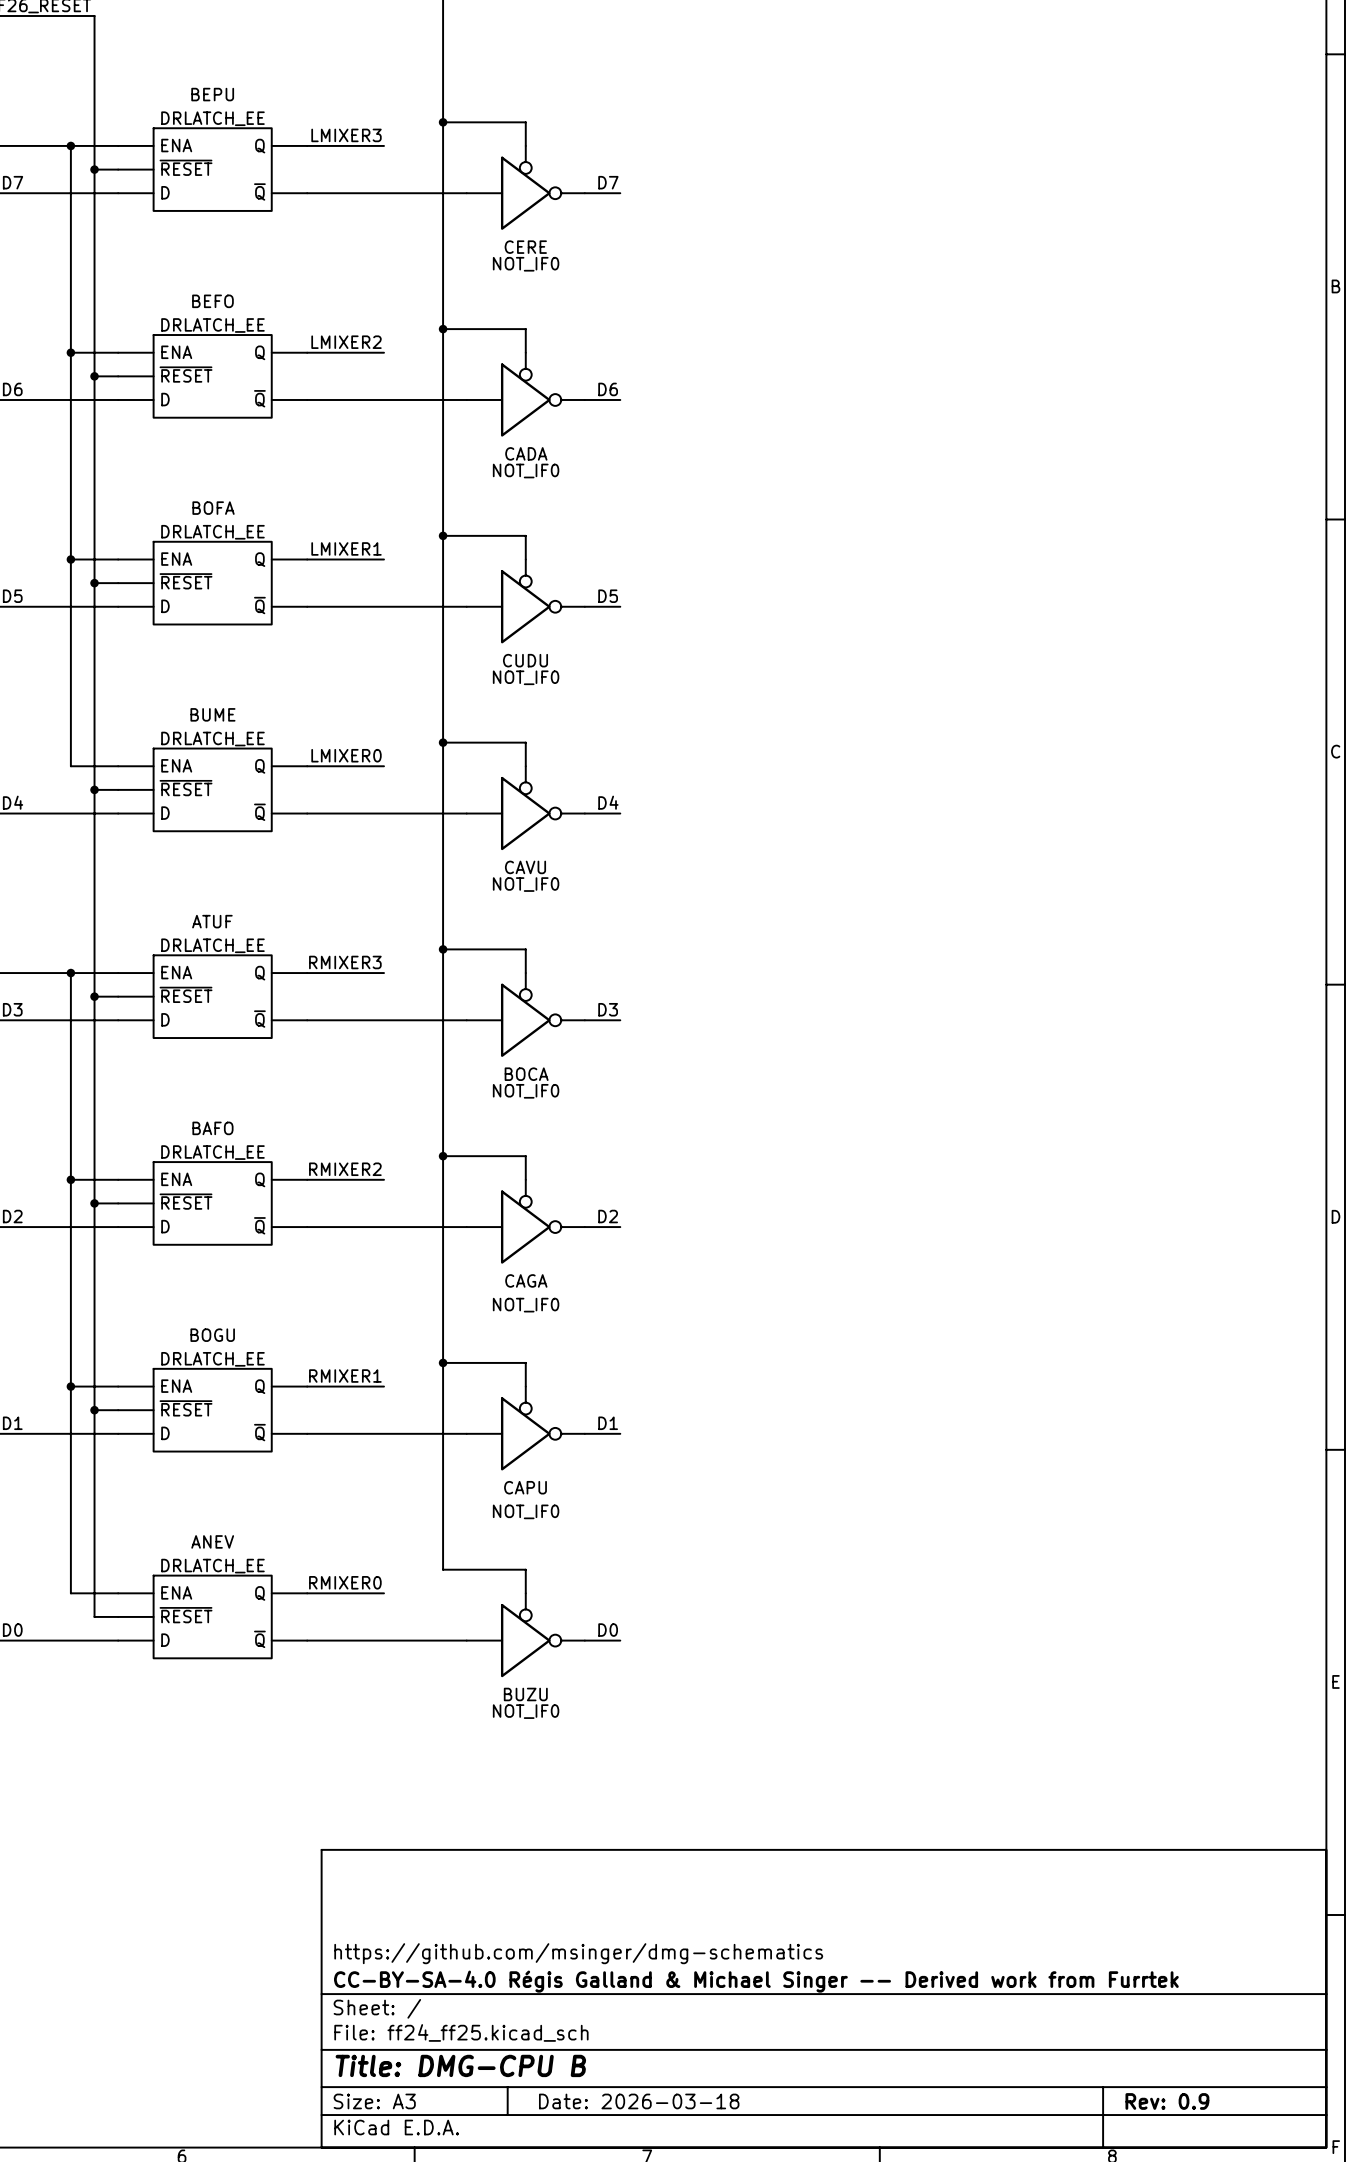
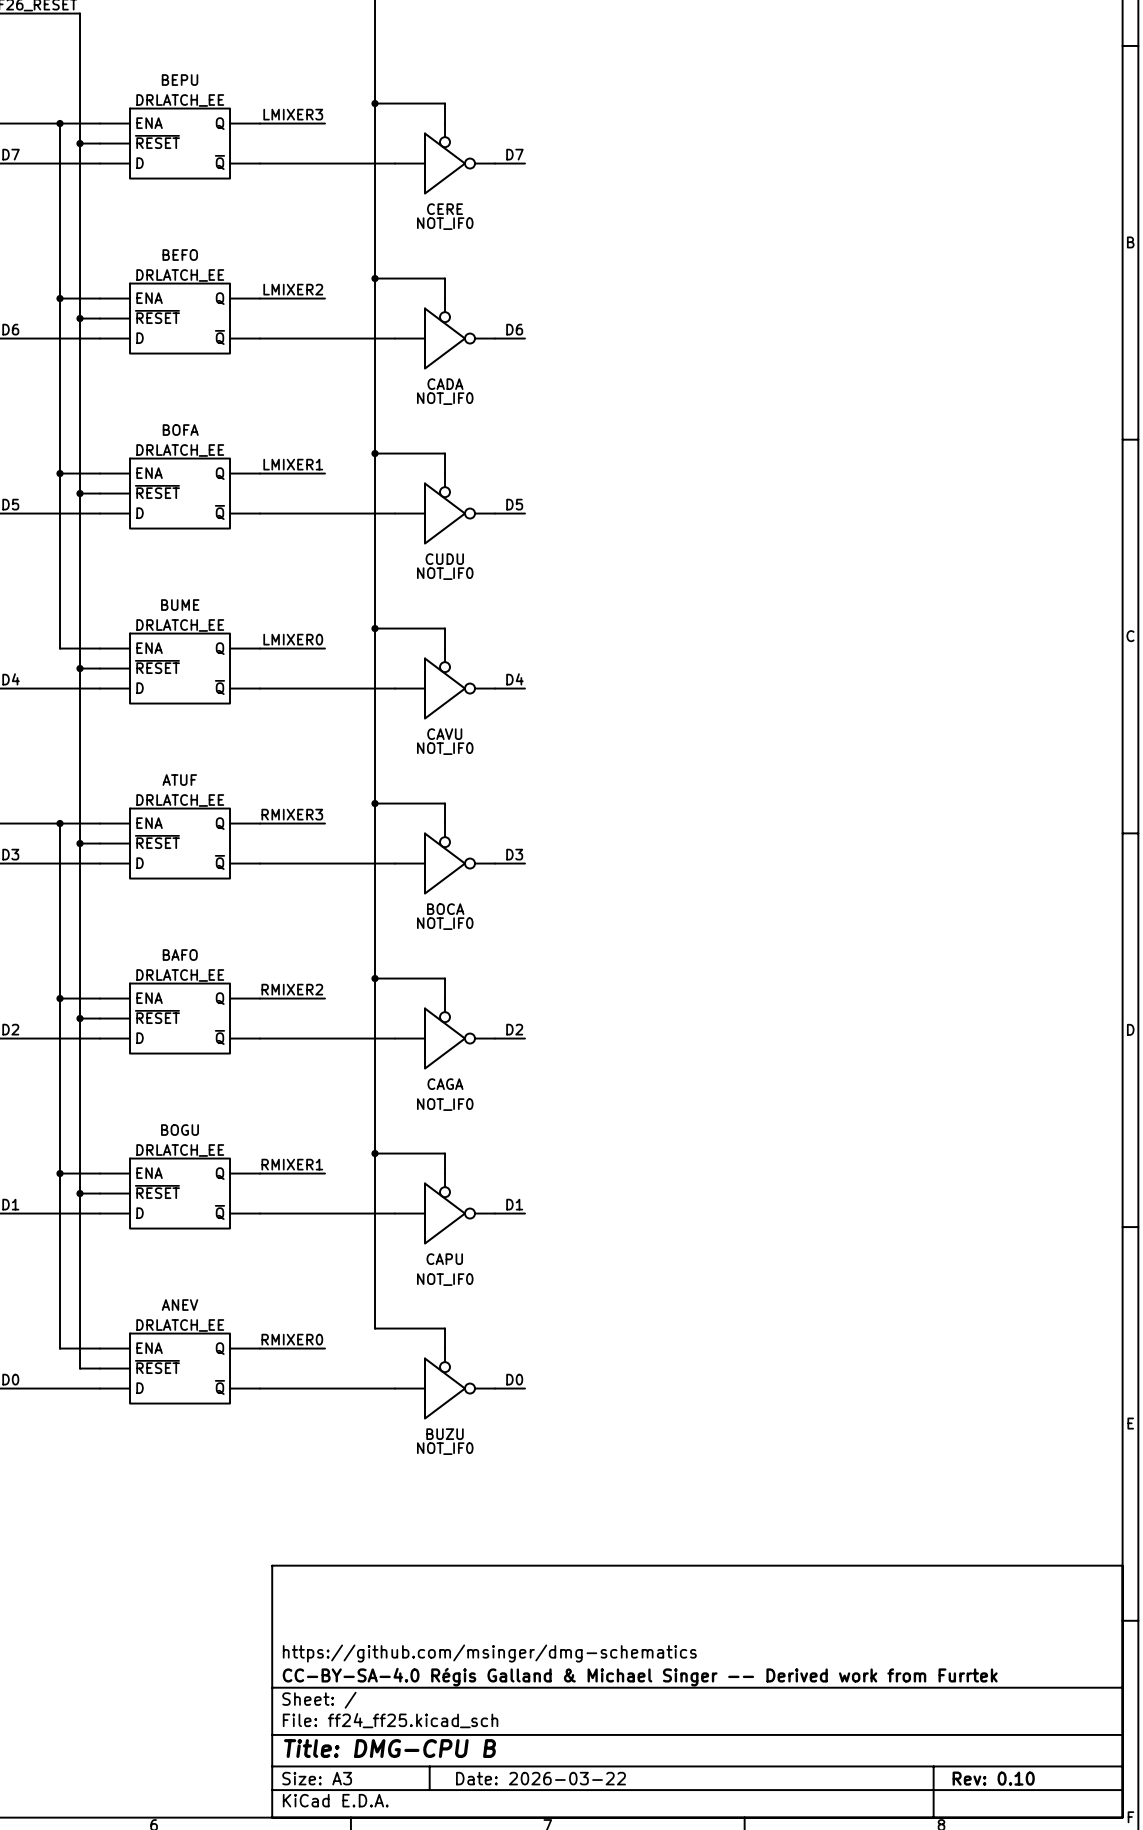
title block: Date: 2026-03-18 (639, 2101) -> Date: 2026-03-22 (541, 1778)
title block: Rev: 0.9 (1167, 2101) -> Rev: 0.10 (993, 1778)

